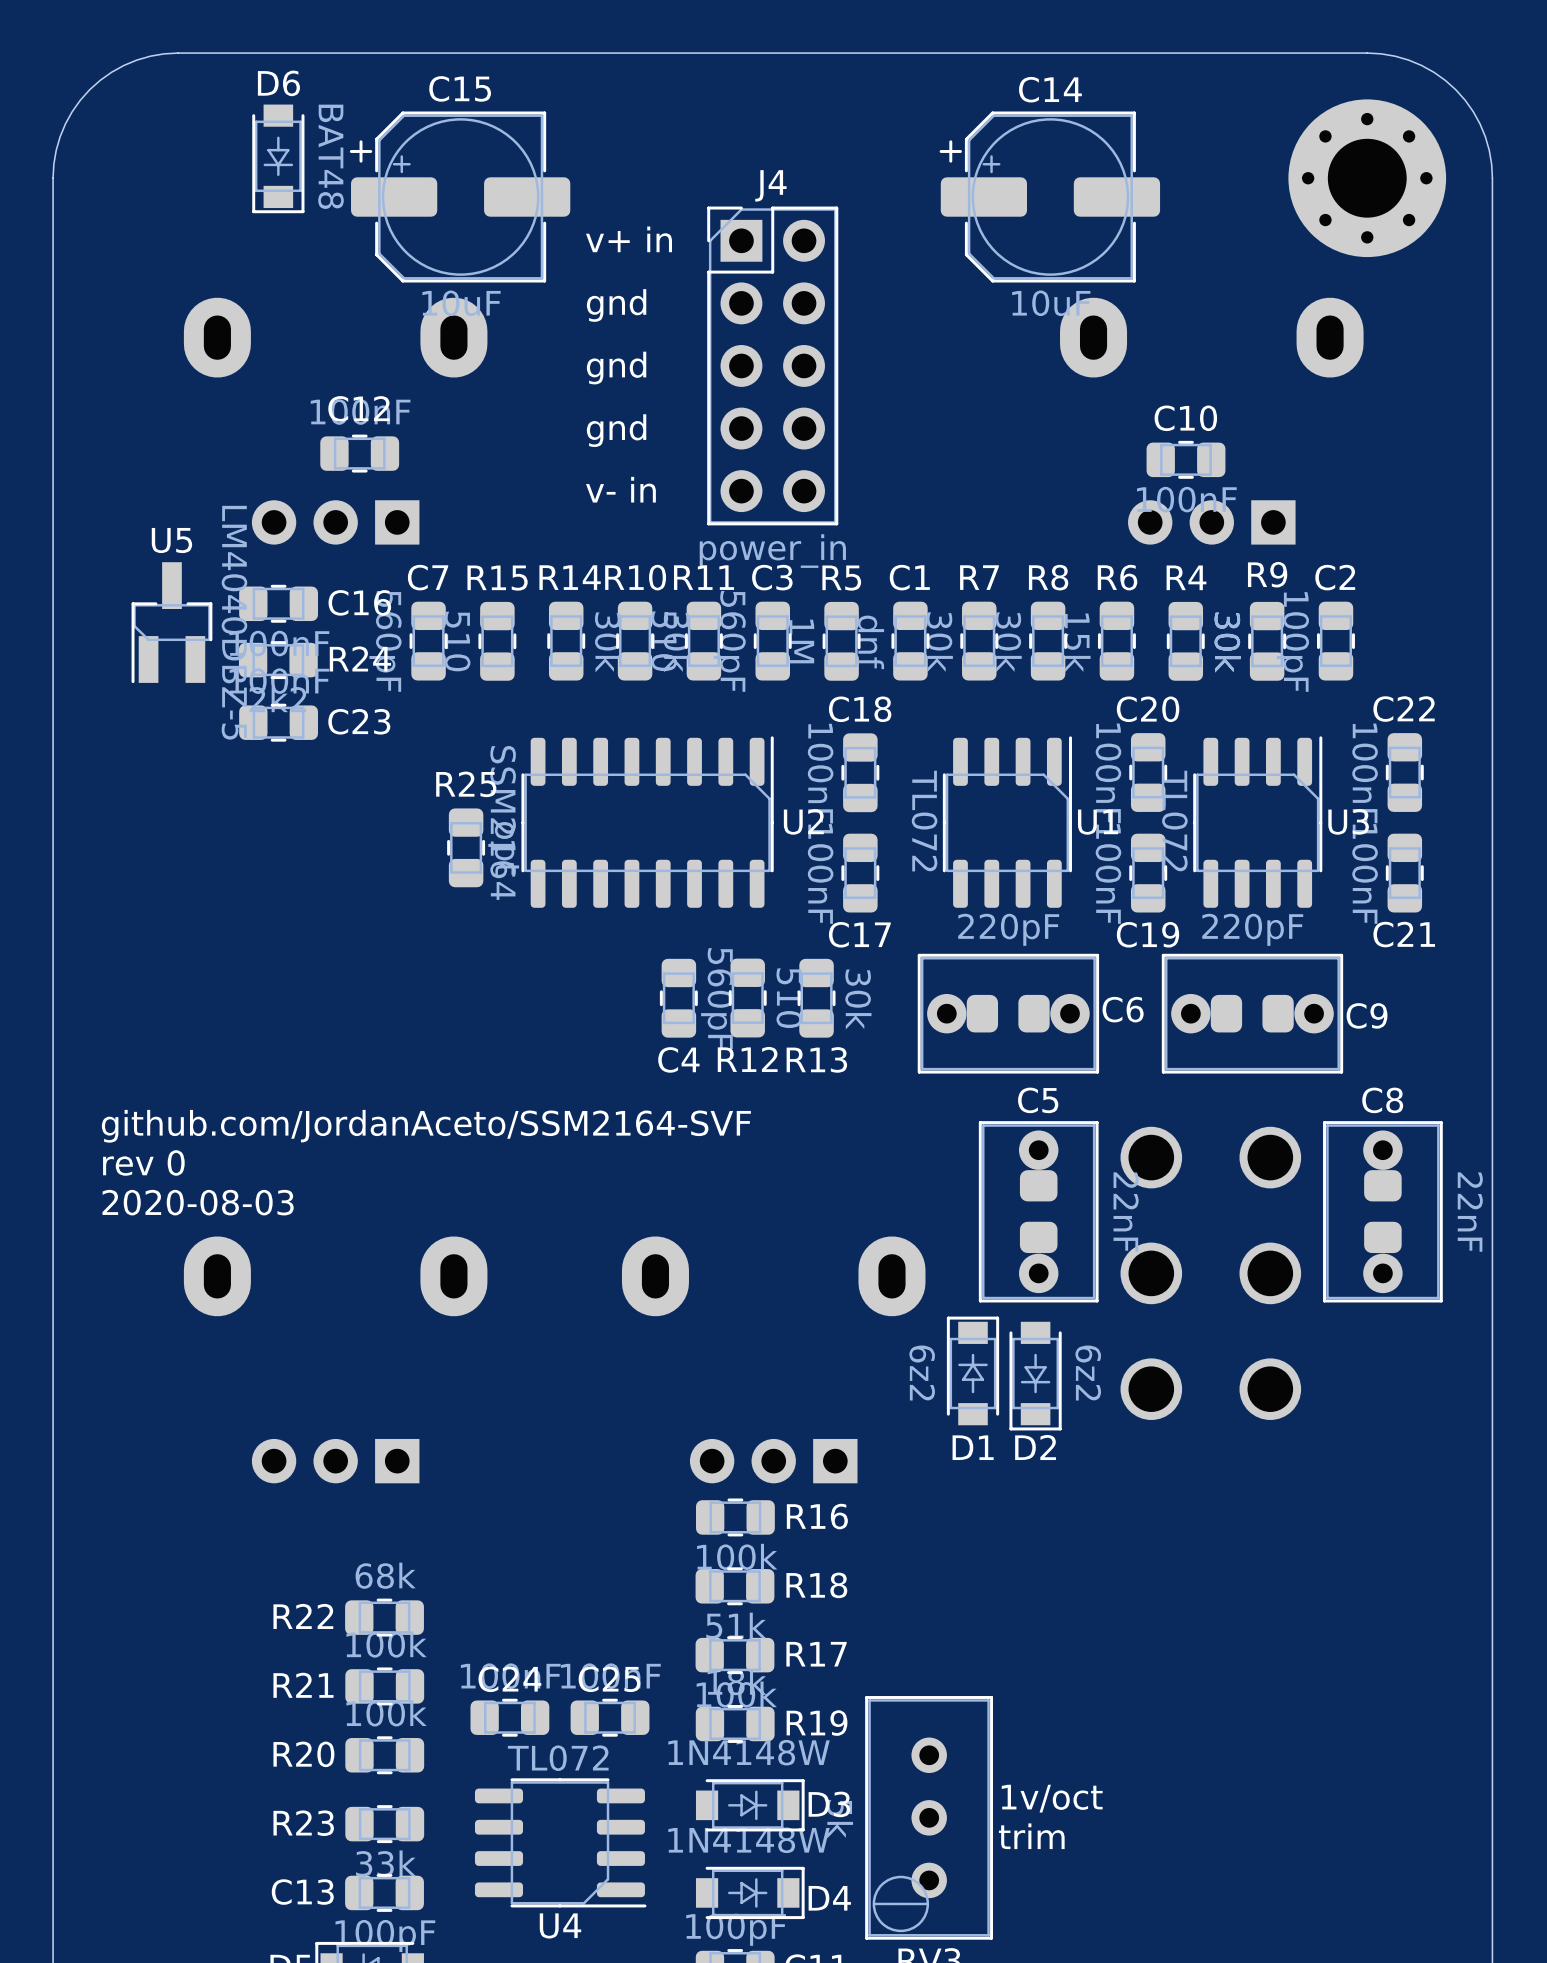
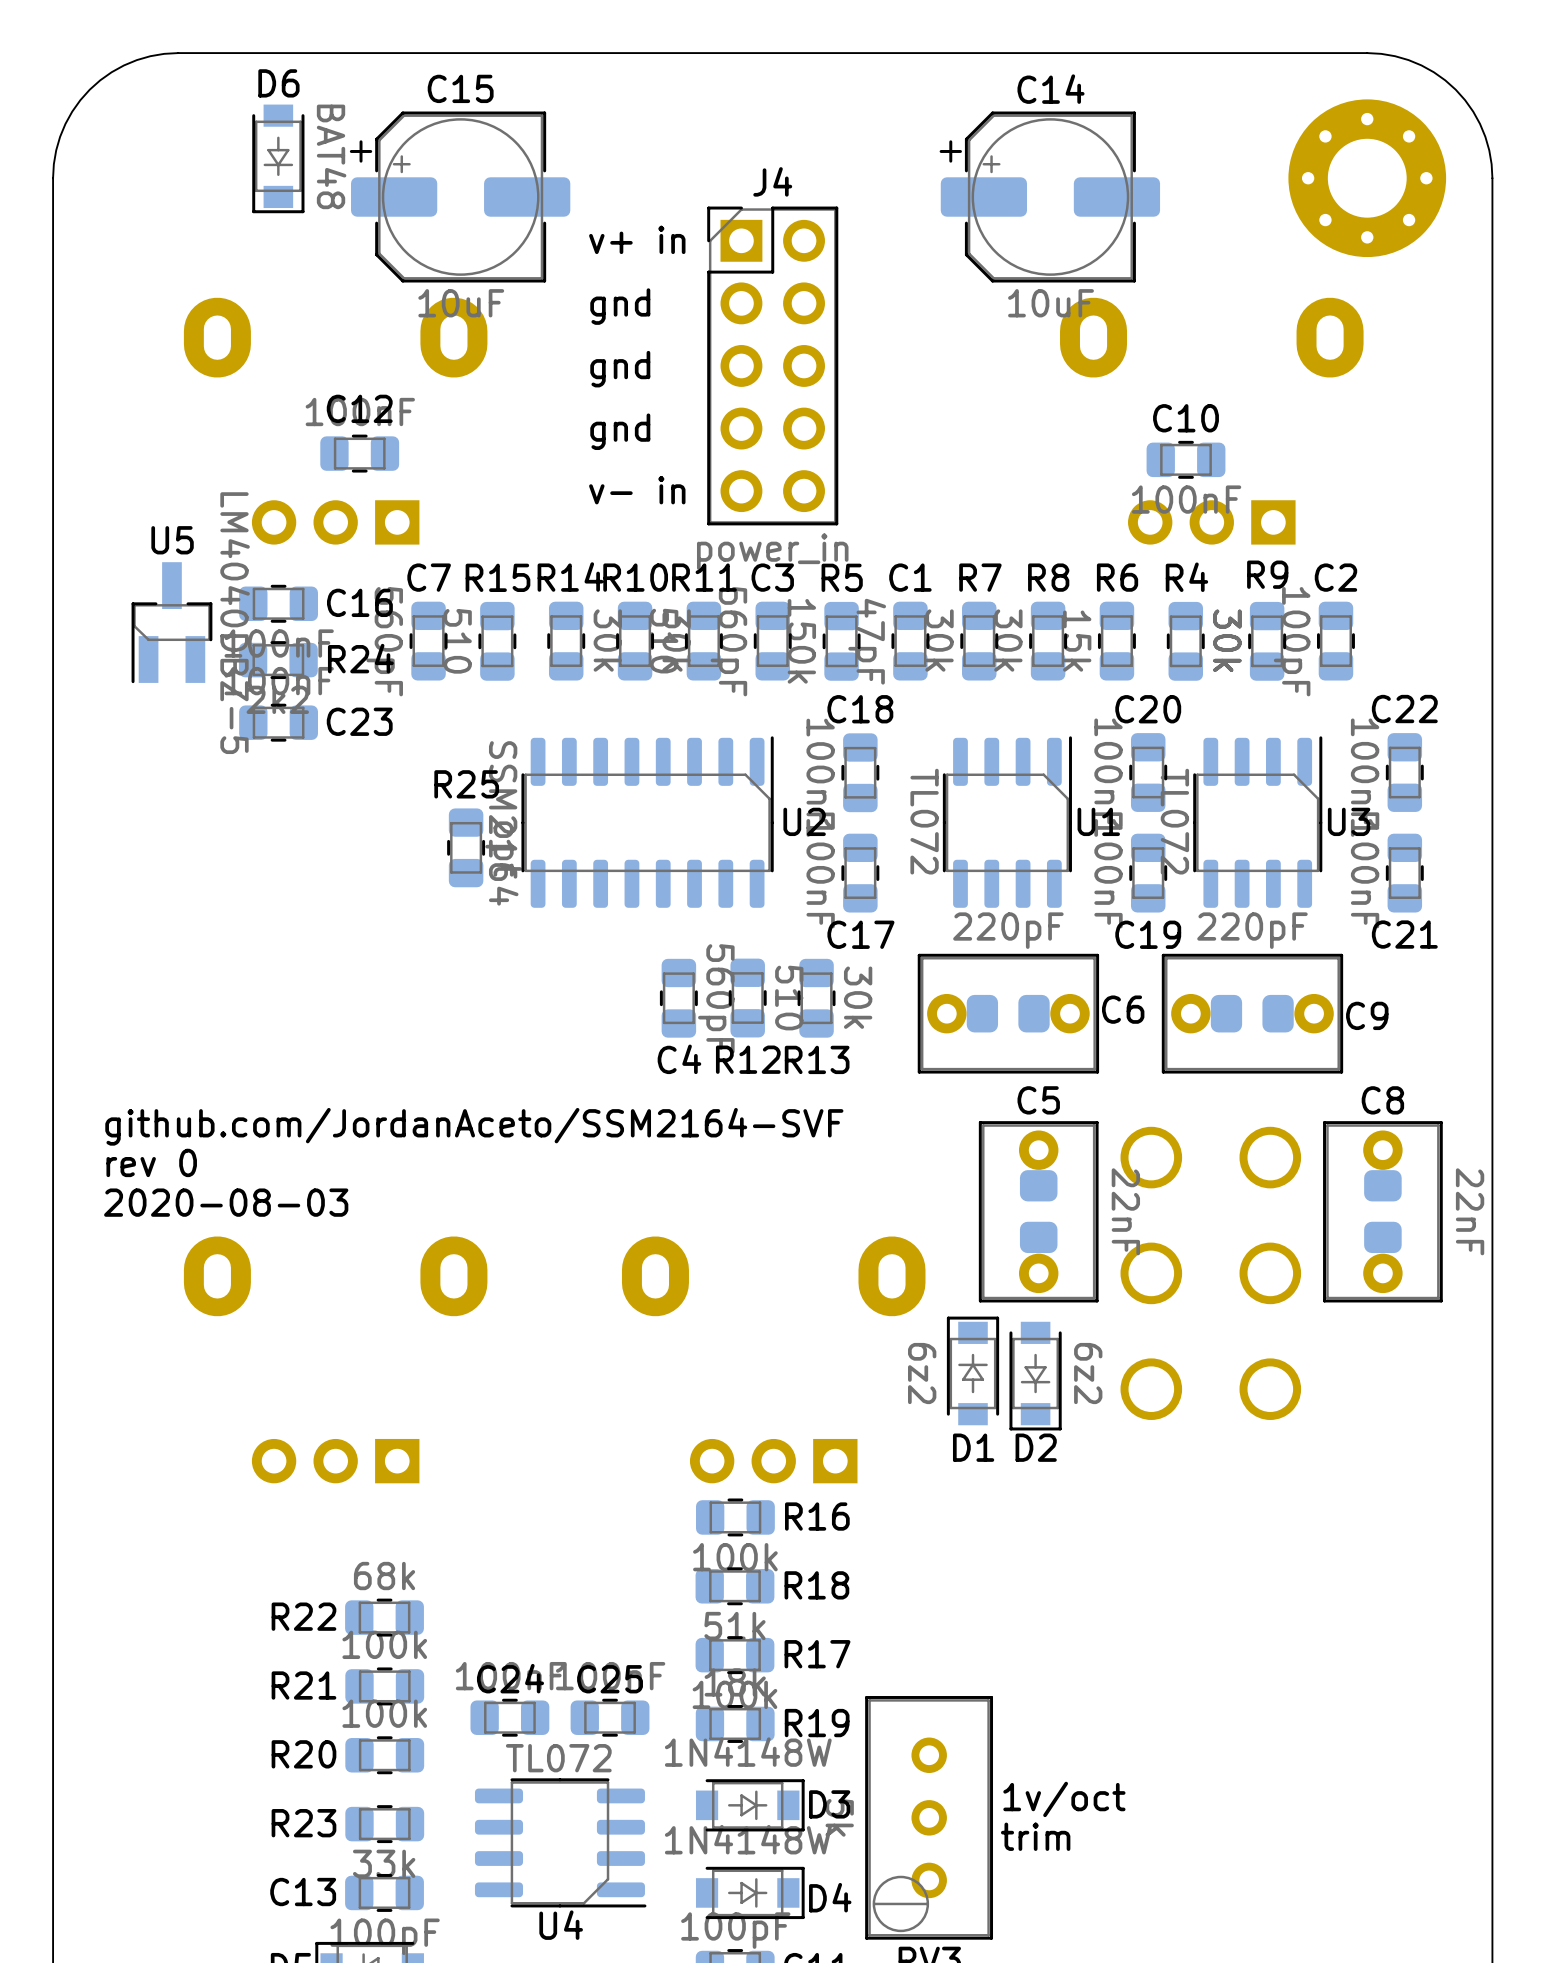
R5 value: 1M (801, 641) -> 150k (801, 641)
C1 value: dnf (870, 642) -> 47pF (867, 641)

